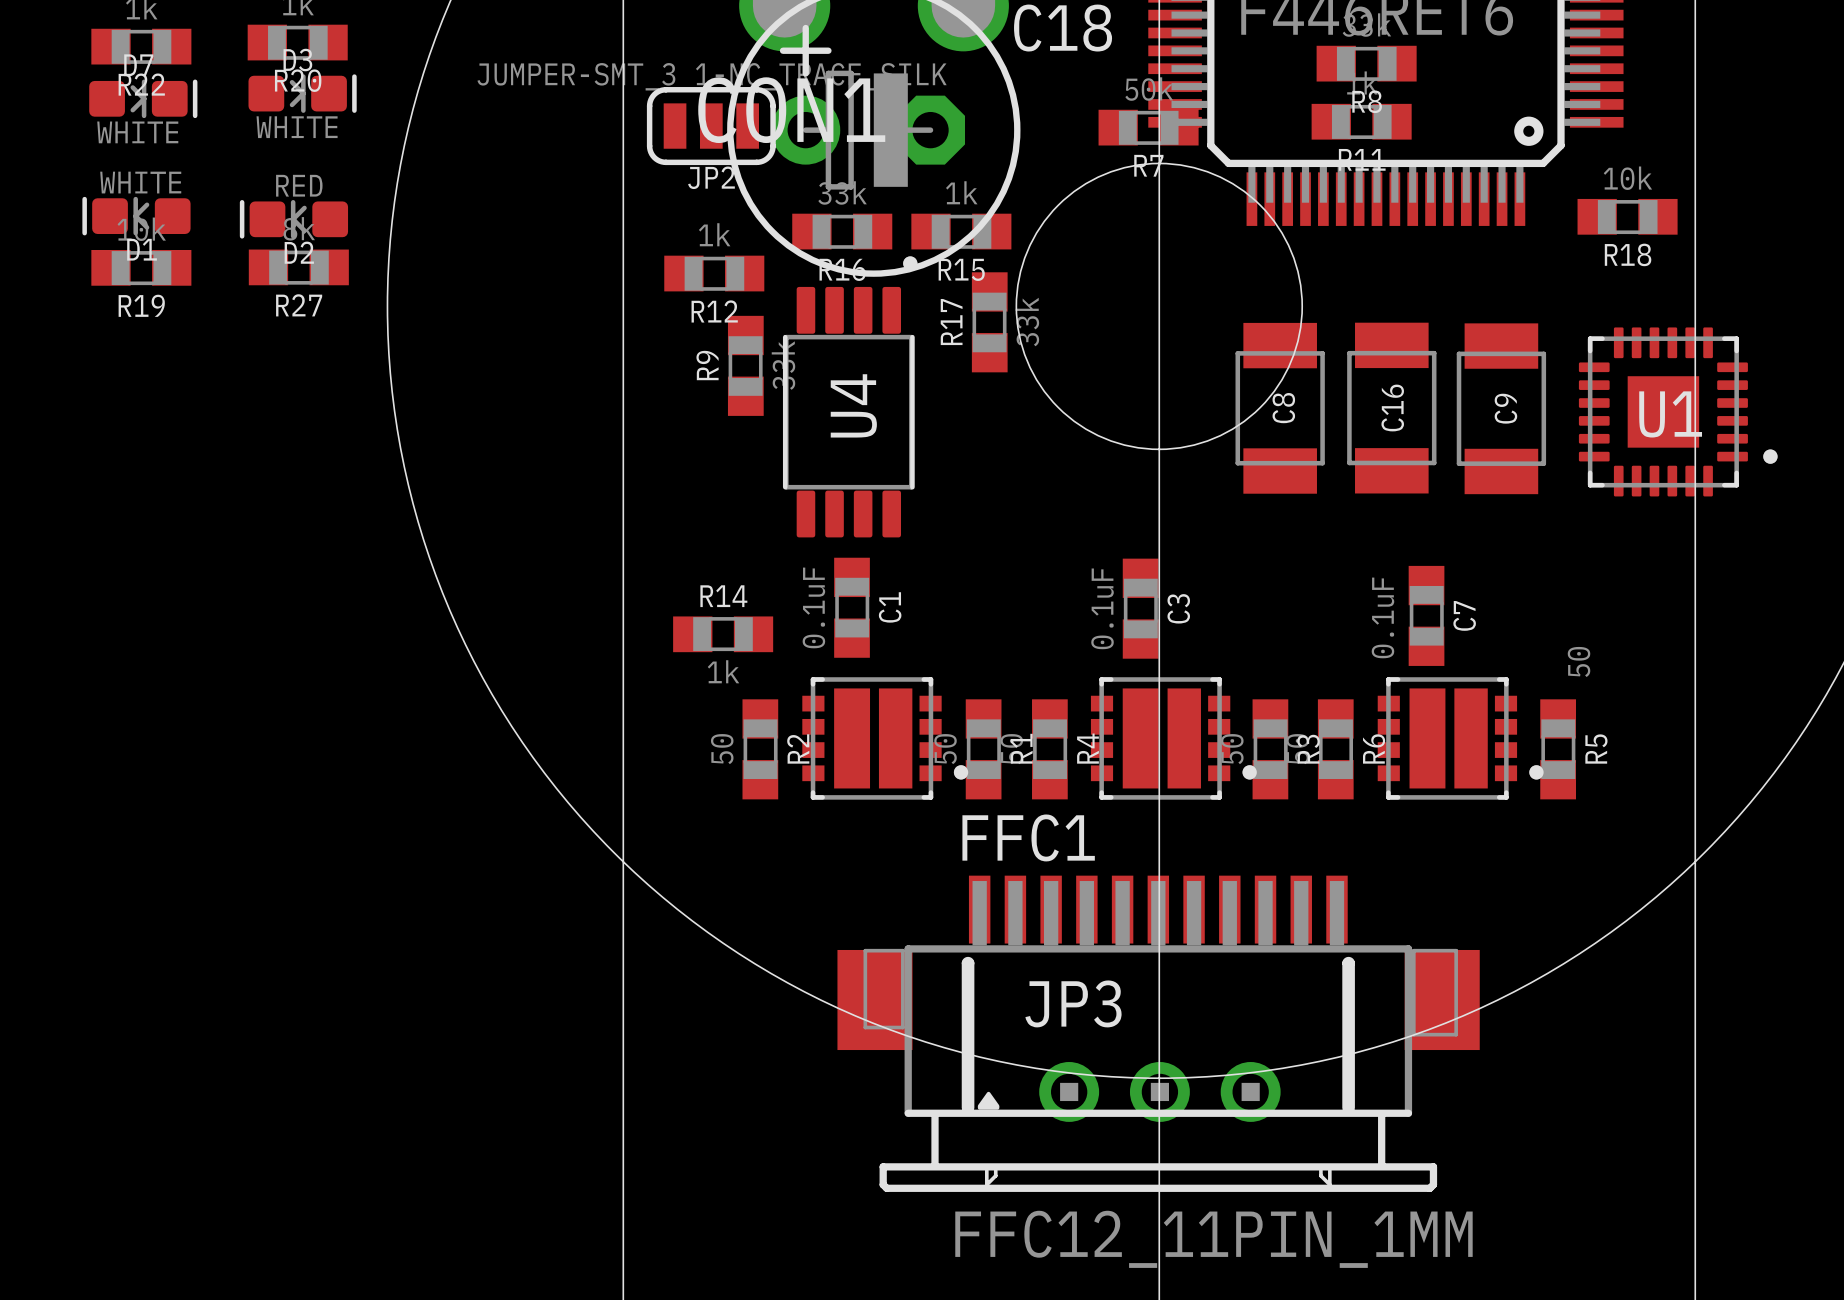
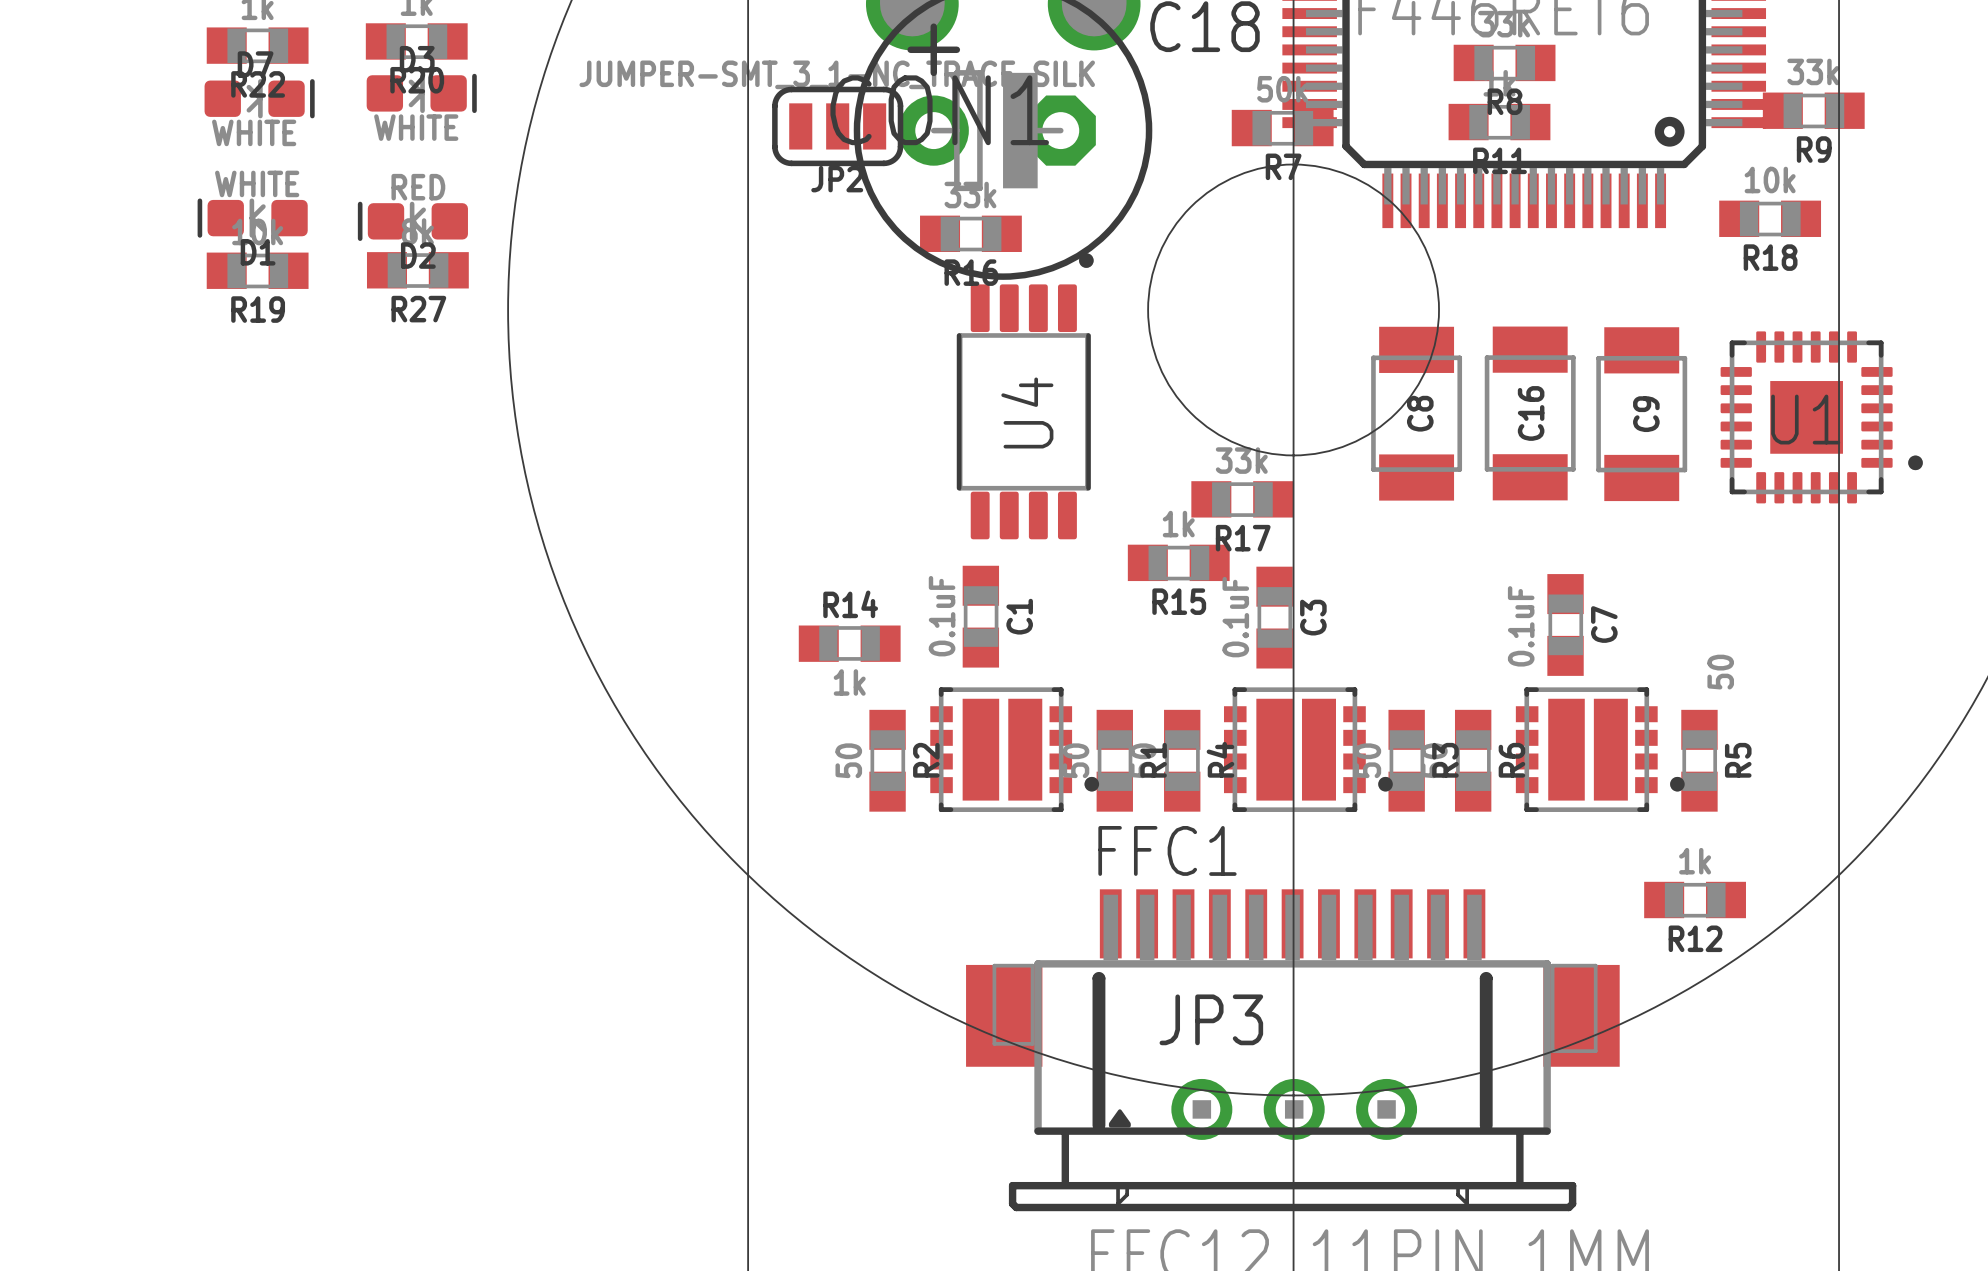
R15 position: (961, 231) -> (1178, 562)
R12 position: (714, 273) -> (1695, 900)
R17 rotation: 0° (989, 322) -> 90° clockwise (1242, 499)
R17 position: (989, 322) -> (1242, 499)
R9 rotation: 0° (745, 365) -> 90° clockwise (1813, 110)
R9 position: (745, 365) -> (1813, 110)
U4 position: (850, 396) -> (1025, 396)

